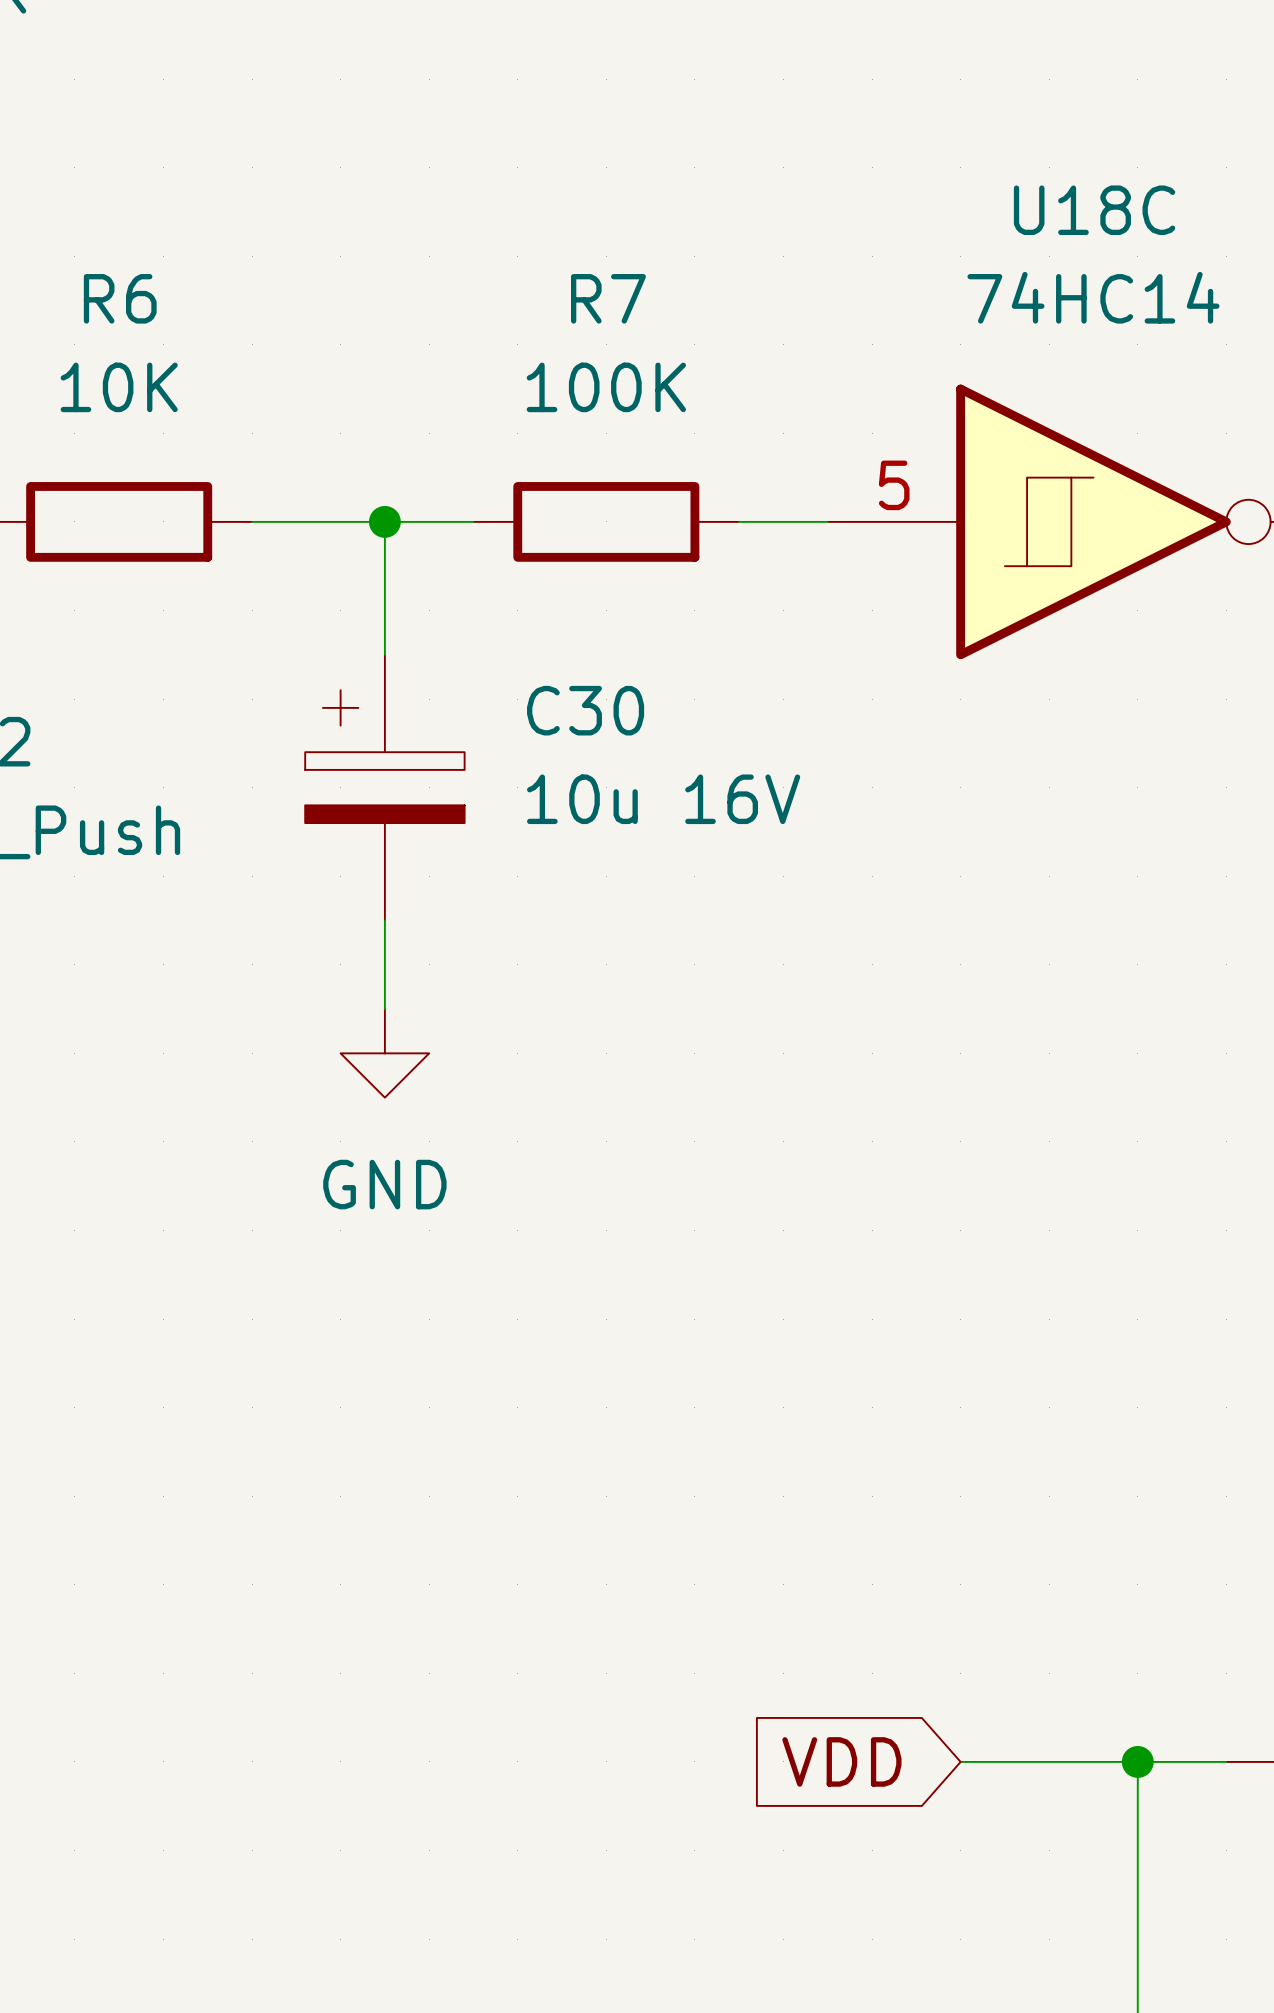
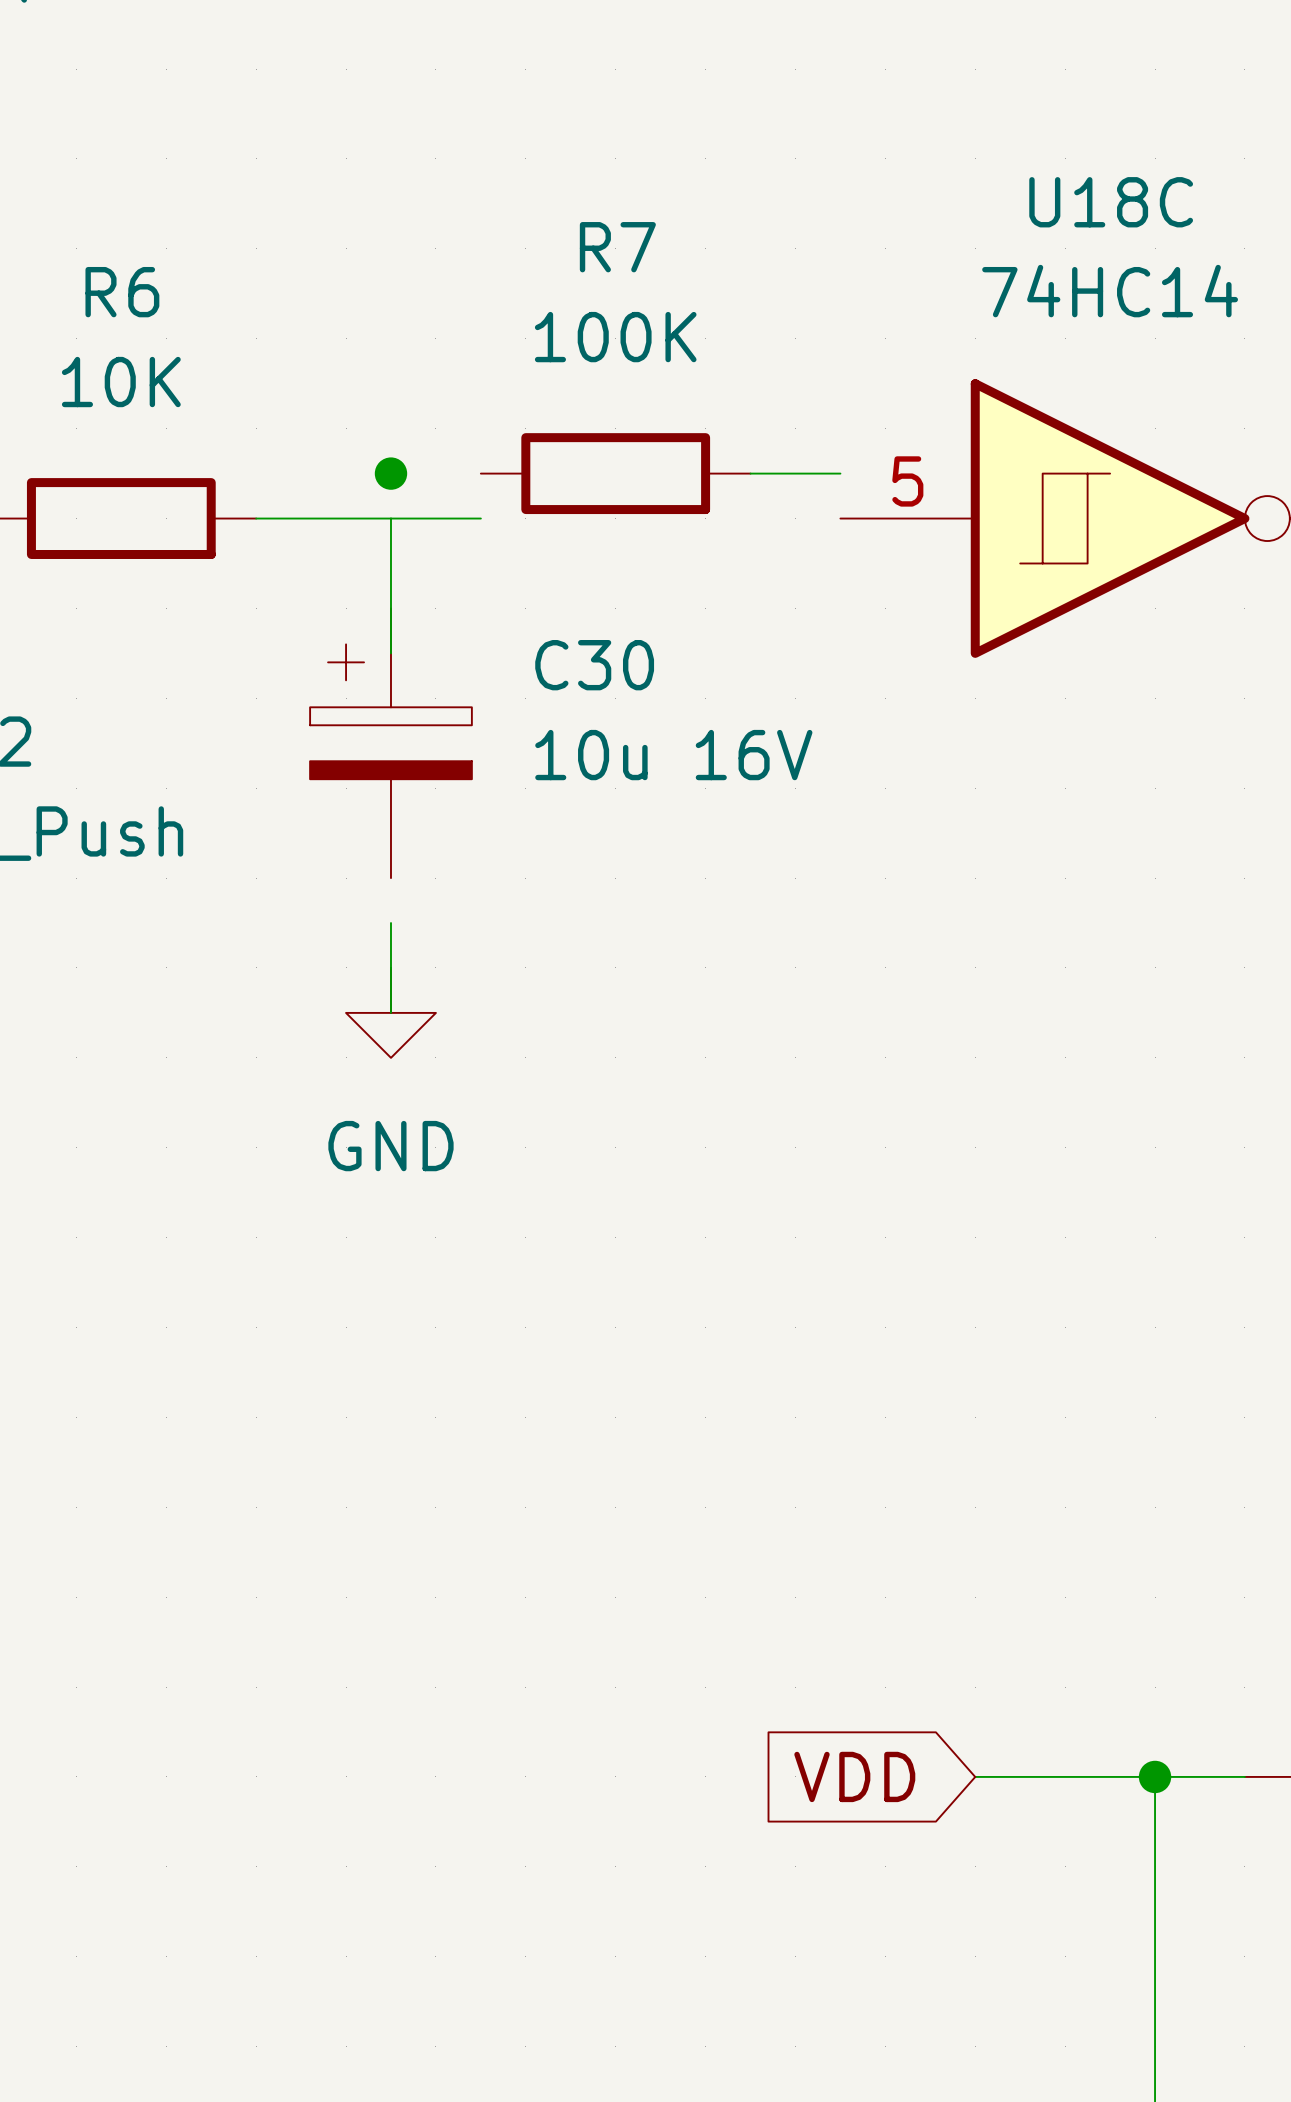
junction position: (384, 521) -> (390, 473)
R7 position: (606, 521) -> (615, 473)
wire: (739, 521) (827, 521) -> (750, 473) (840, 473)
C30 position: (384, 787) -> (390, 743)
power symbol position: GND (384, 1053) -> GND (390, 1012)

